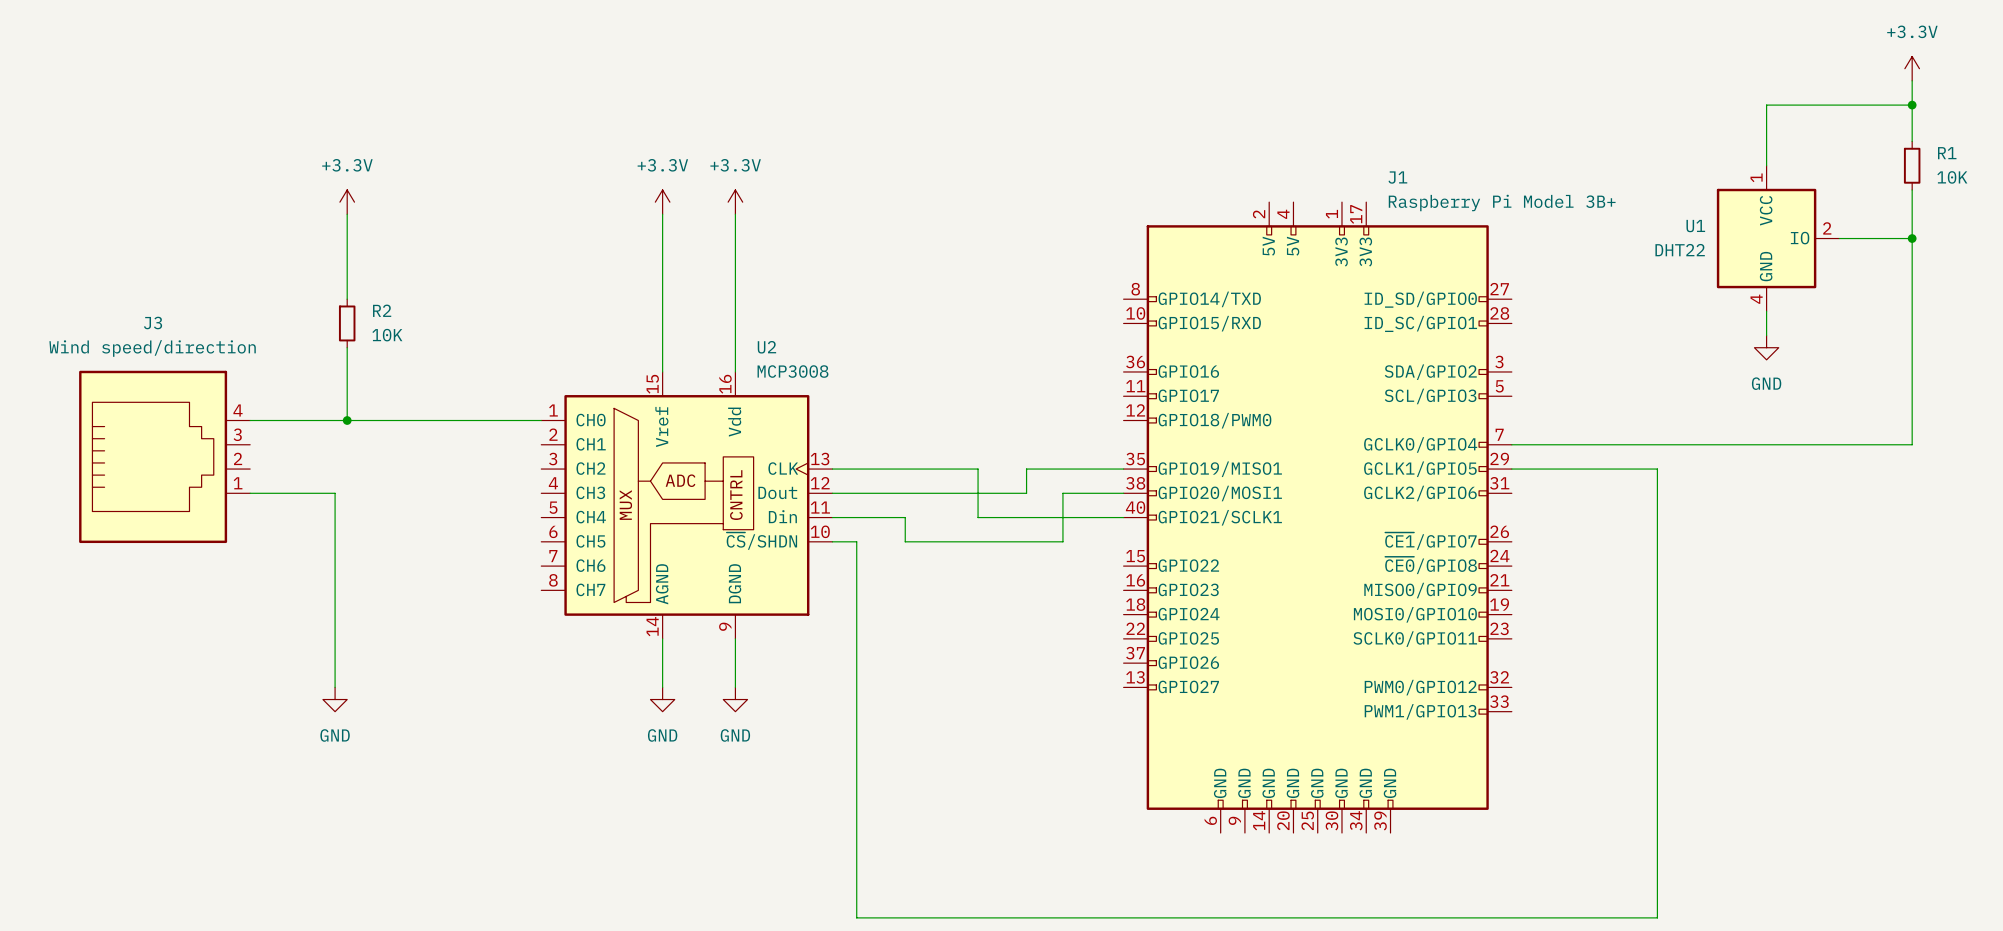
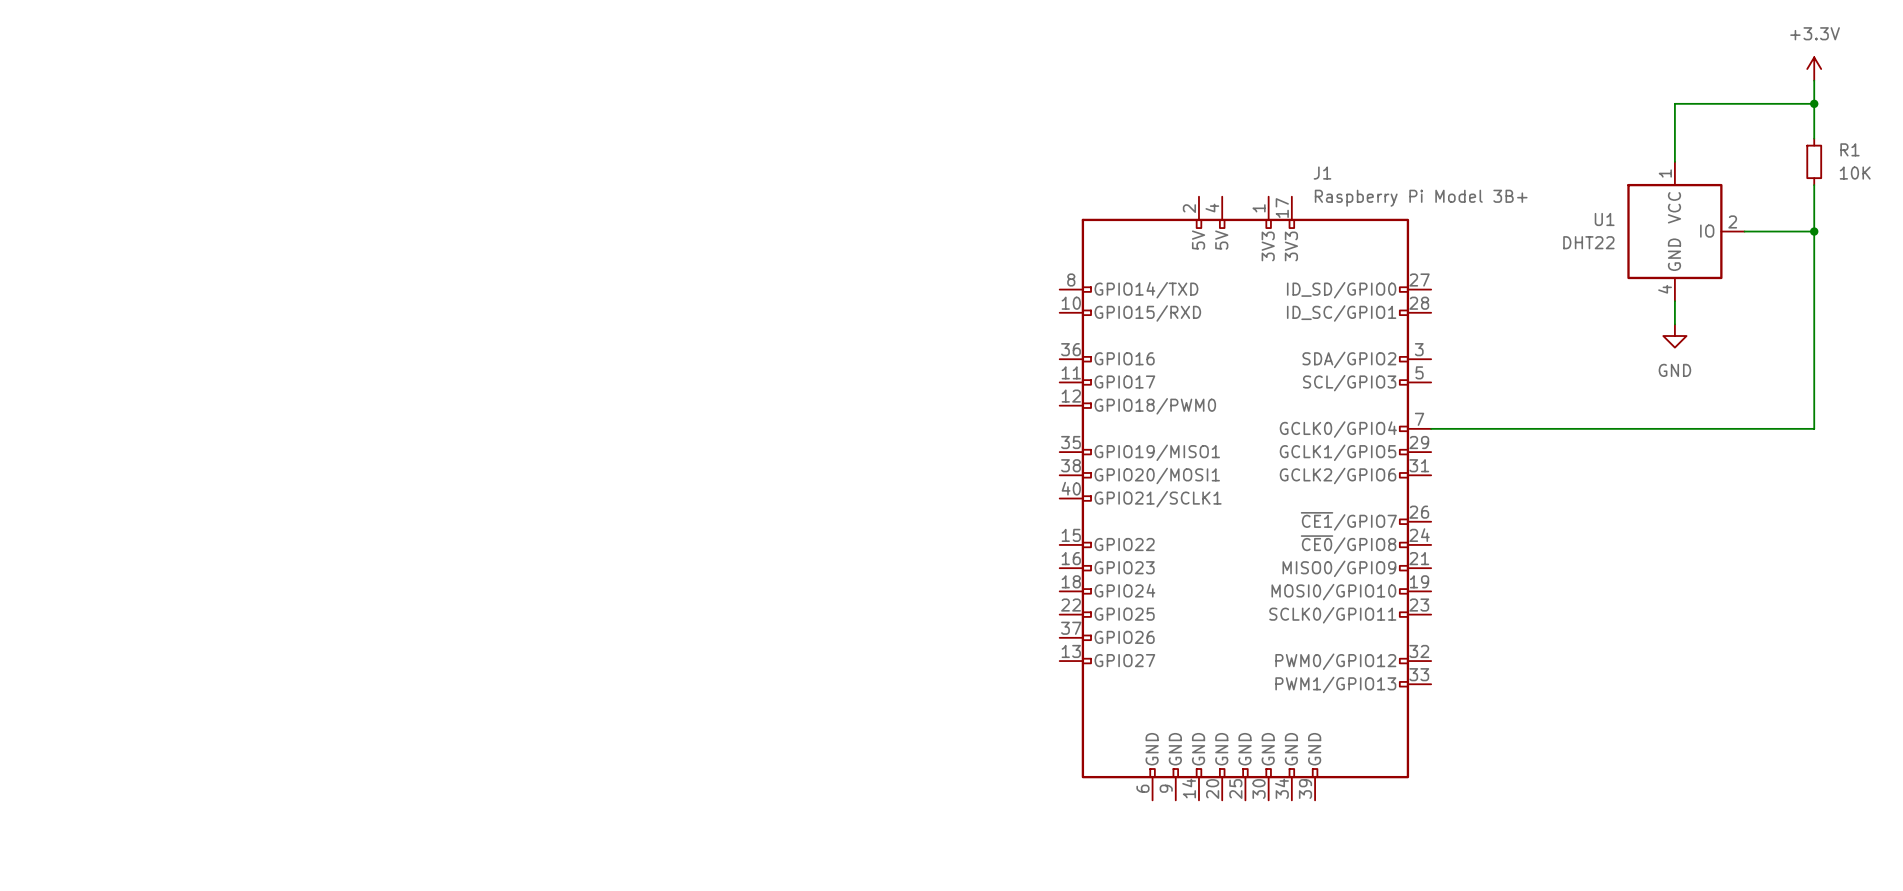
power symbol: +3.3V (347, 202) -> none
power symbol: +3.3V (662, 202) -> none
power symbol: +3.3V (735, 202) -> none
wire: (347, 214) (347, 299) -> none
wire: (662, 214) (662, 371) -> none
wire: (735, 214) (735, 371) -> none
R2: 10K (347, 323) -> none
wire: (347, 347) (347, 420) -> none
wire: (250, 420) (541, 420) -> none
junction: (347, 420) -> none
J3: Wind speed/direction (164, 456) -> none
wire: (832, 469) (978, 469) (978, 517) (1123, 517) -> none
wire: (1123, 469) (1026, 469) (1026, 493) (832, 493) -> none
wire: (1511, 469) (1657, 469) (1657, 917) (856, 917) (856, 541) (832, 541) -> none
wire: (250, 493) (335, 493) (335, 687) -> none
wire: (1123, 493) (1062, 493) (1062, 541) (905, 541) (905, 517) (832, 517) -> none
U2: MCP3008 (686, 505) -> none
wire: (662, 638) (662, 687) -> none
wire: (735, 638) (735, 687) -> none
power symbol: GND (335, 699) -> none
power symbol: GND (662, 699) -> none
power symbol: GND (735, 699) -> none

